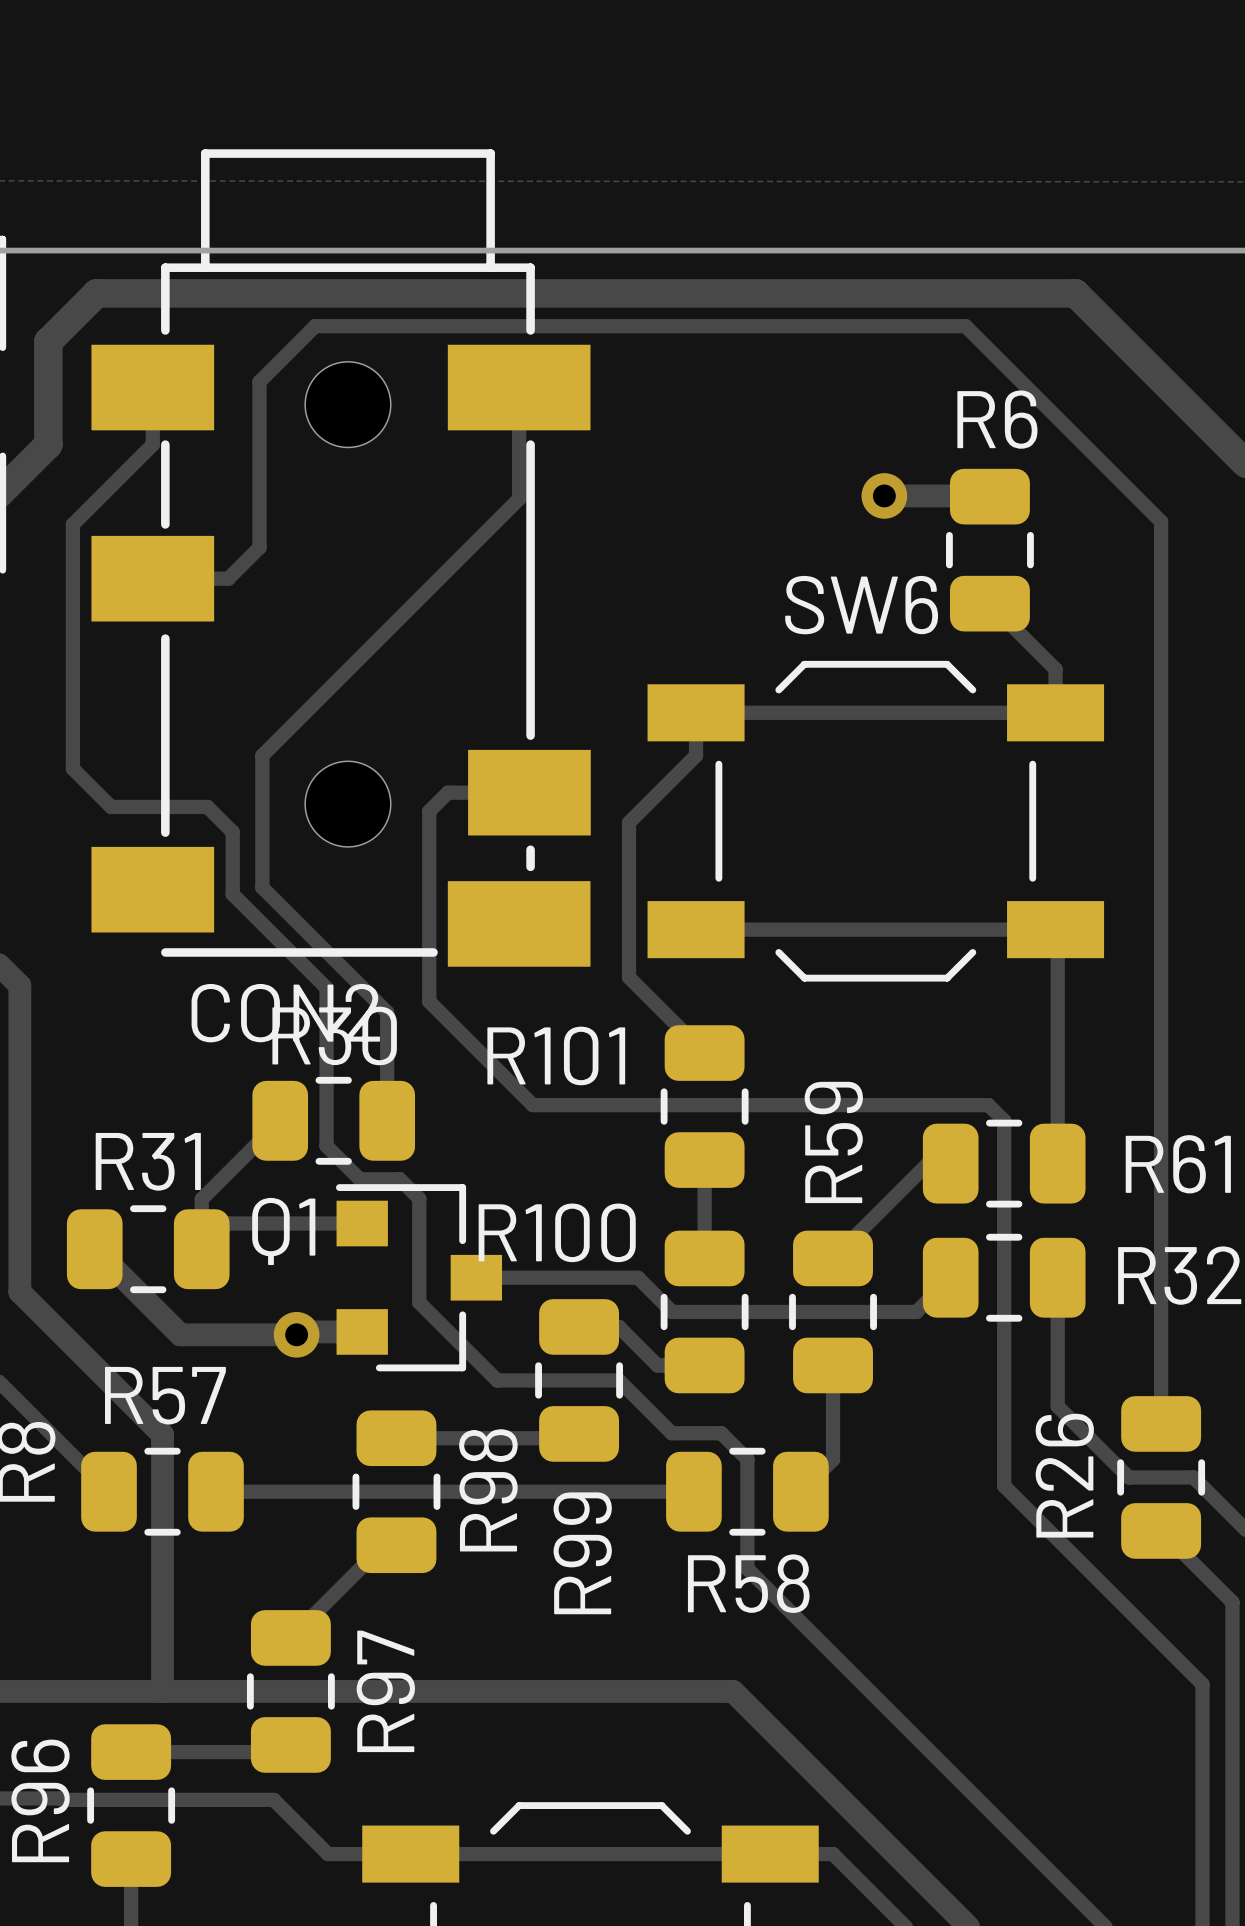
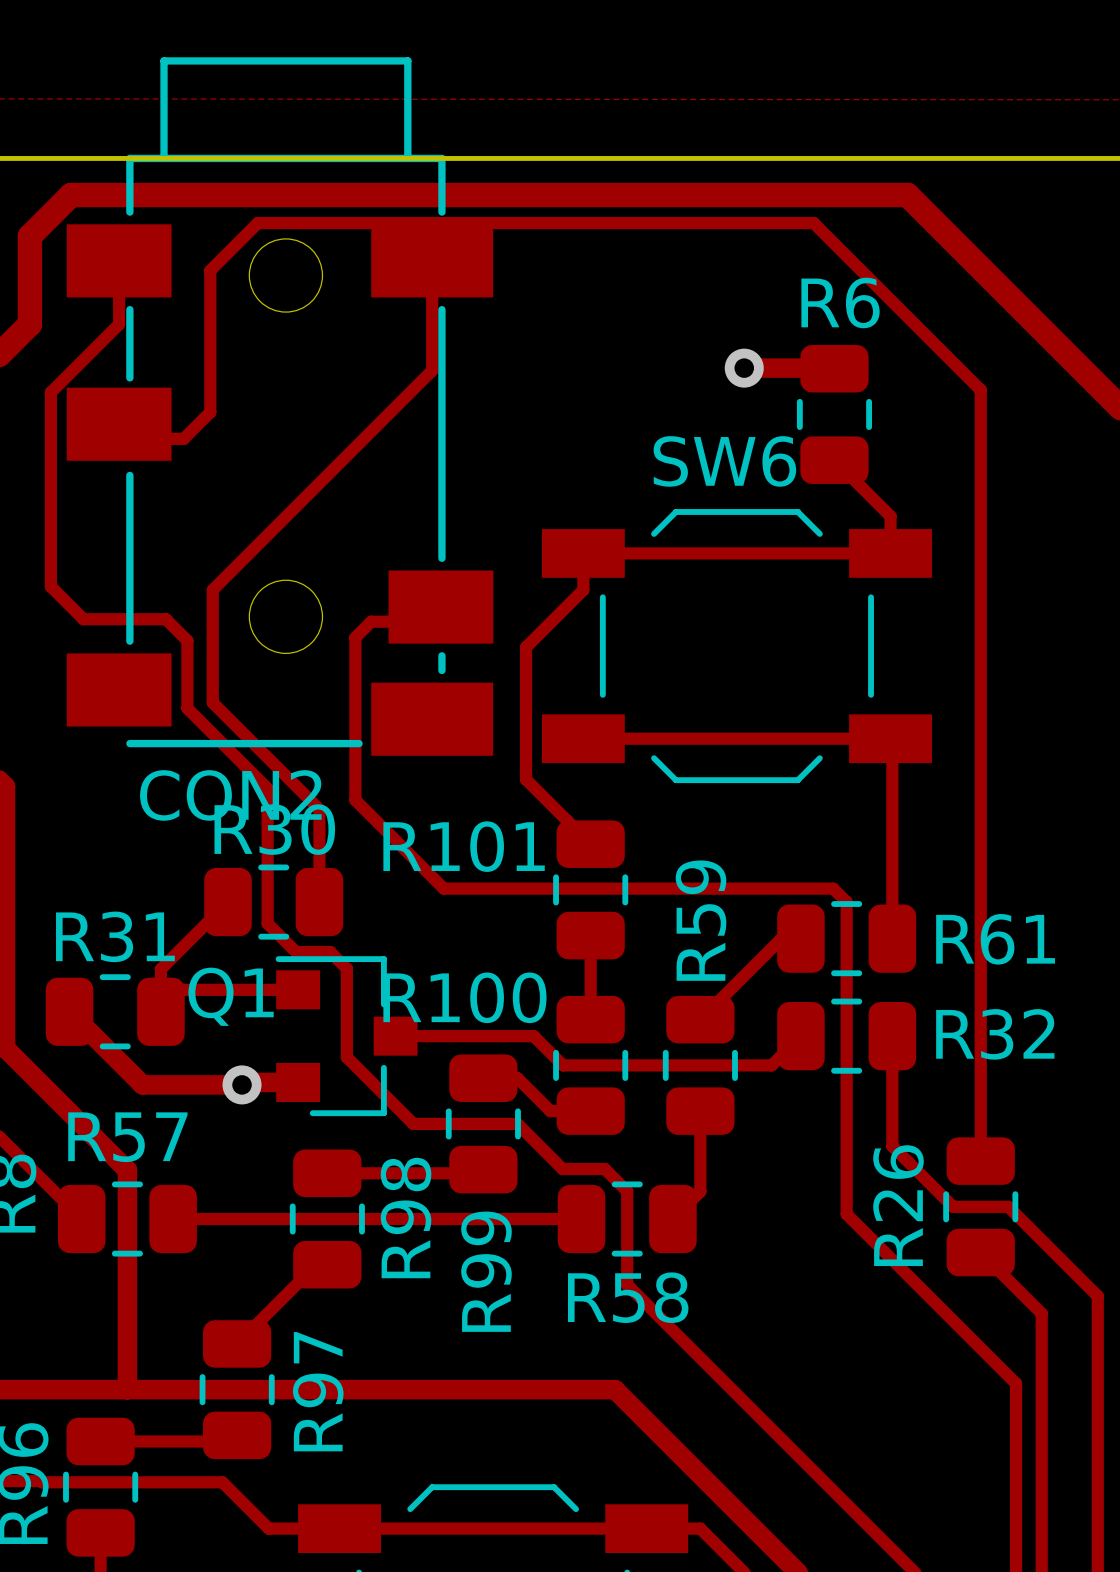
CON2 position: (341, 558) -> (280, 406)
track: (72, 751) (72, 768) (111, 806) (207, 806) (232, 832) -> (50, 586) (83, 619) (165, 619) (187, 640) (187, 655)

